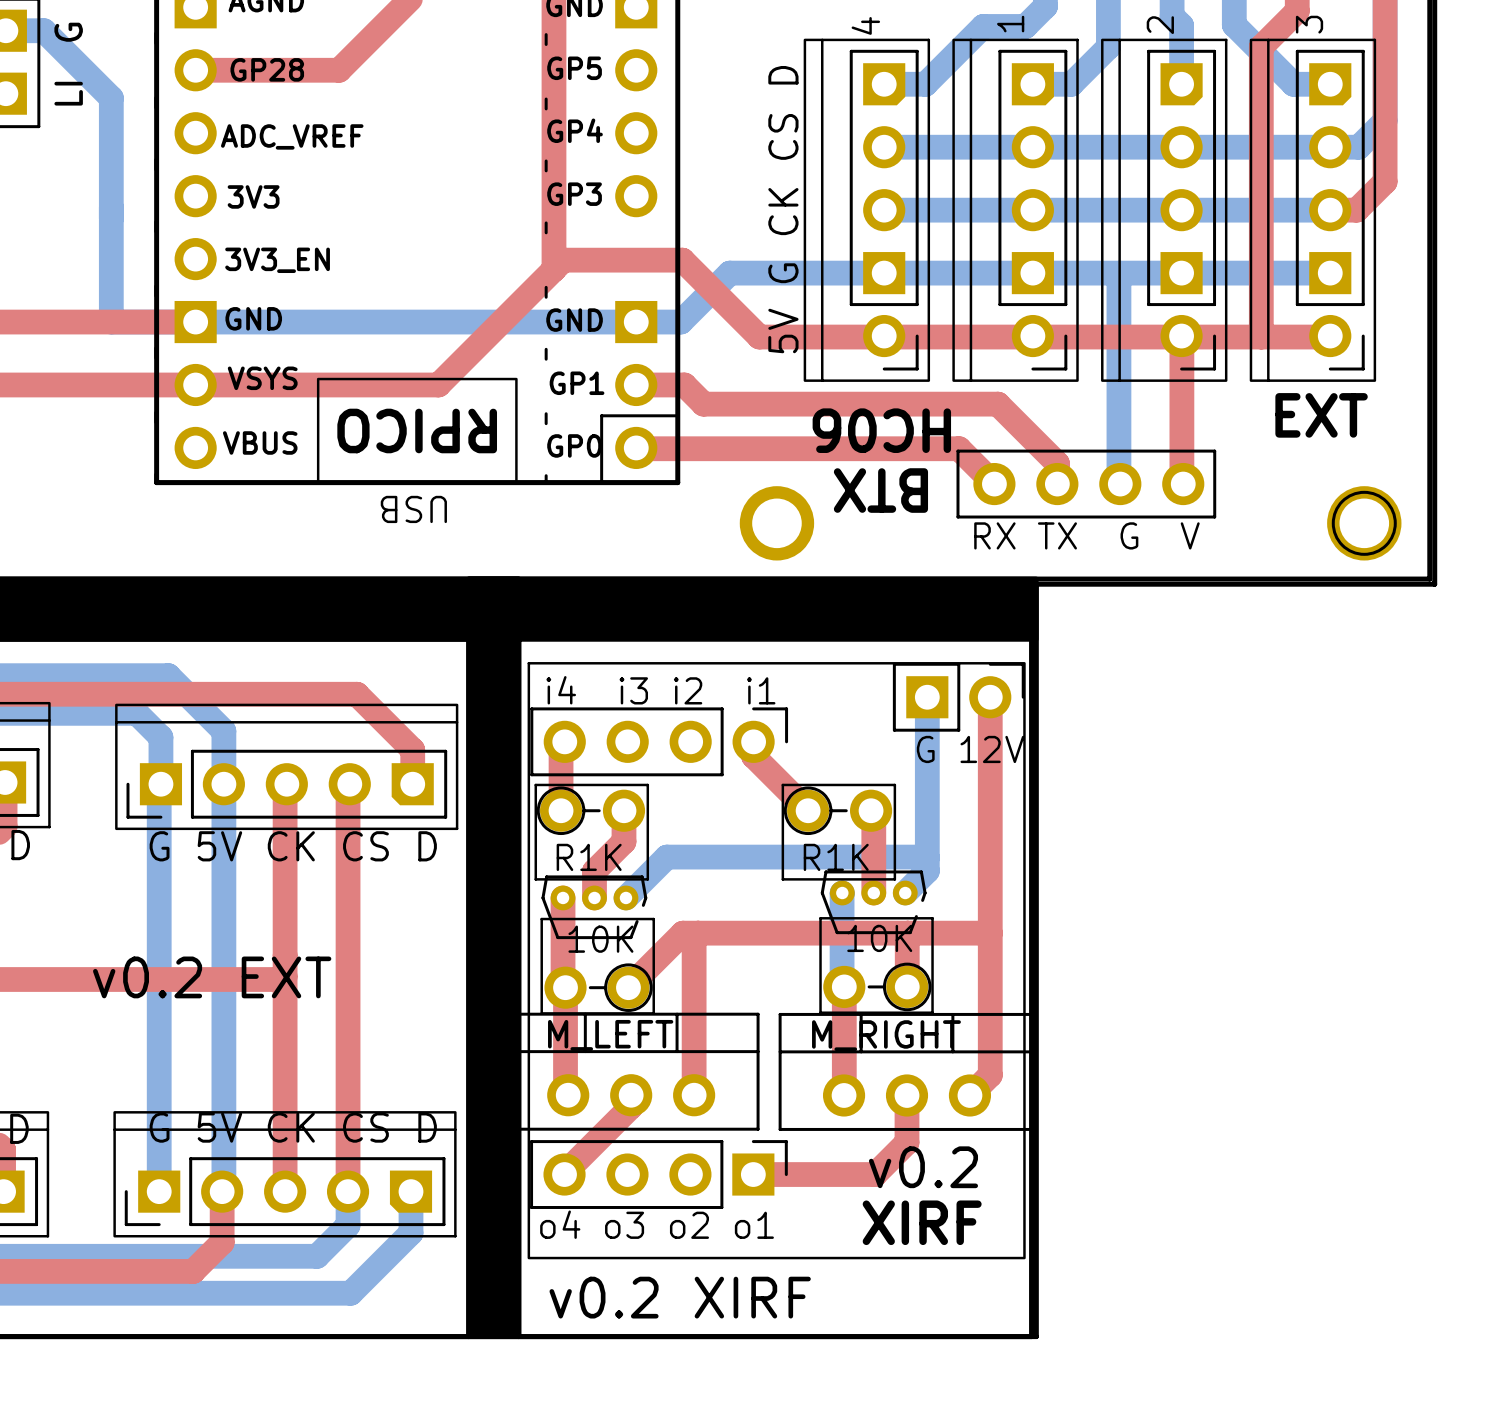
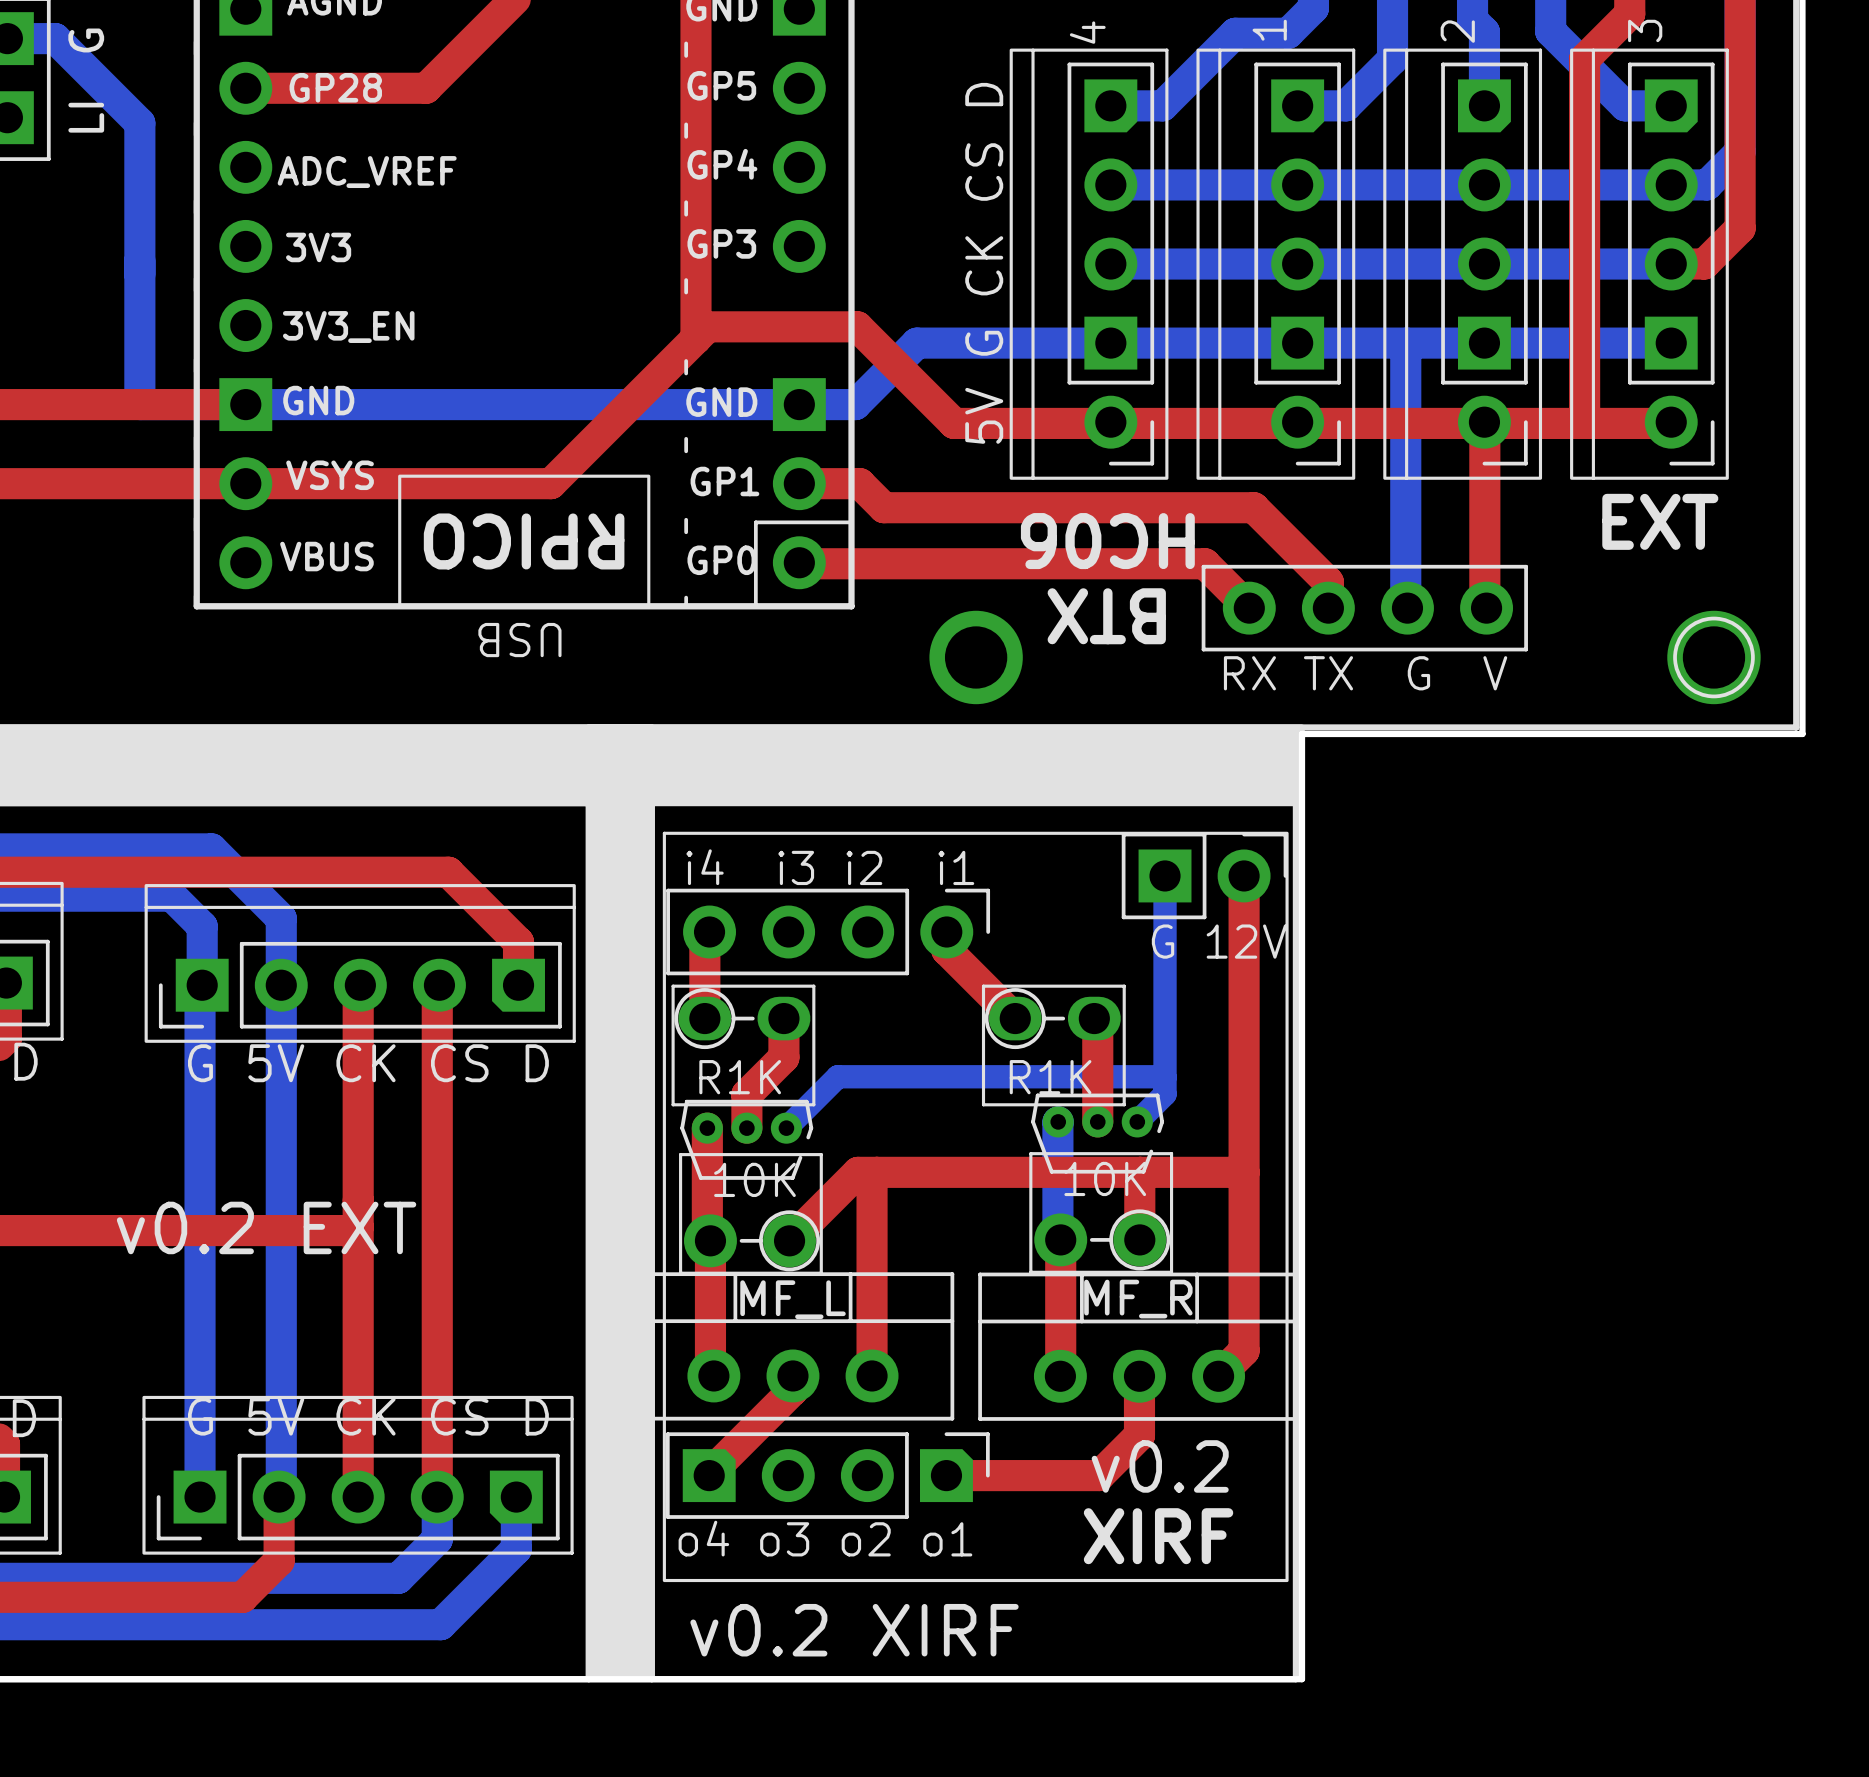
part footprint: [527, 662, 1026, 1260] -> [662, 831, 1289, 1583]
bottom track width: thick (927, 697) (927, 870) (905, 893) -> thin (1165, 875) (1165, 1094) (1137, 1121)
R1K footprint: [536, 786, 646, 836] -> [674, 988, 811, 1050]
R1K footprint: [783, 786, 893, 836] -> [984, 988, 1121, 1050]
bottom track width: thick (927, 857) (666, 857) (625, 897) -> thin (1165, 1077) (837, 1076) (786, 1128)
part value: M_LEFT (610, 1035) -> MF_L (793, 1299)
part value: M_RIGHT (886, 1035) -> MF_R (1138, 1299)

